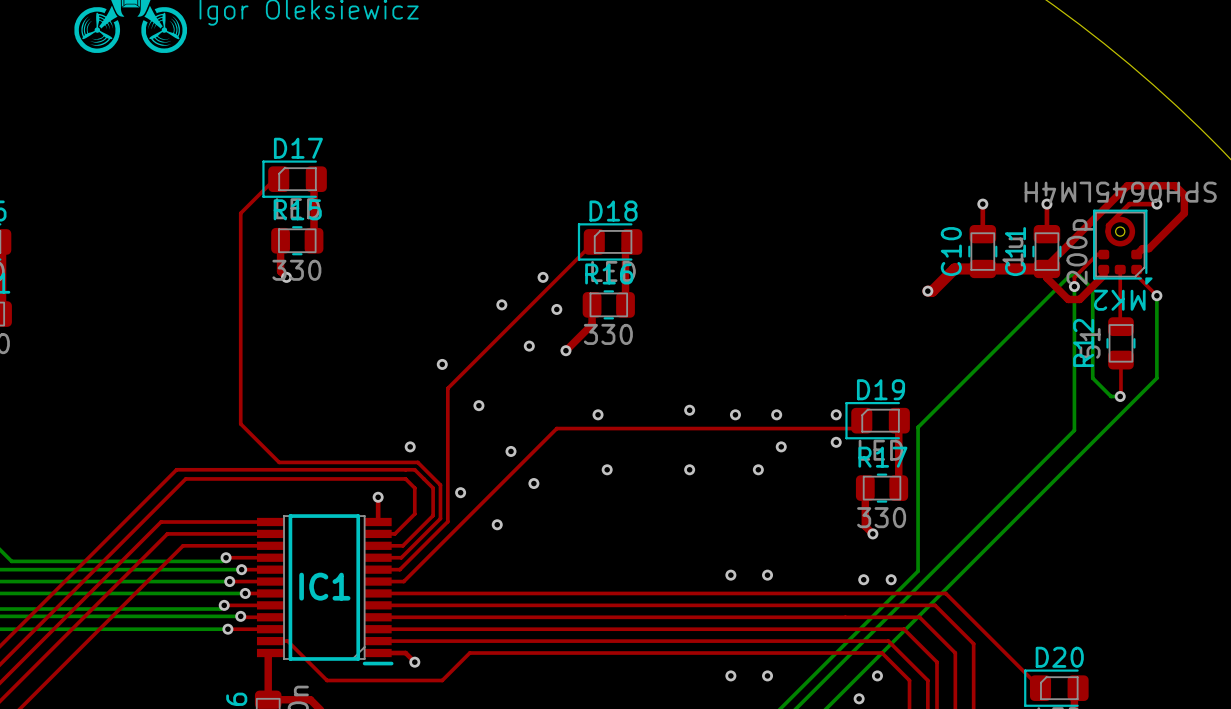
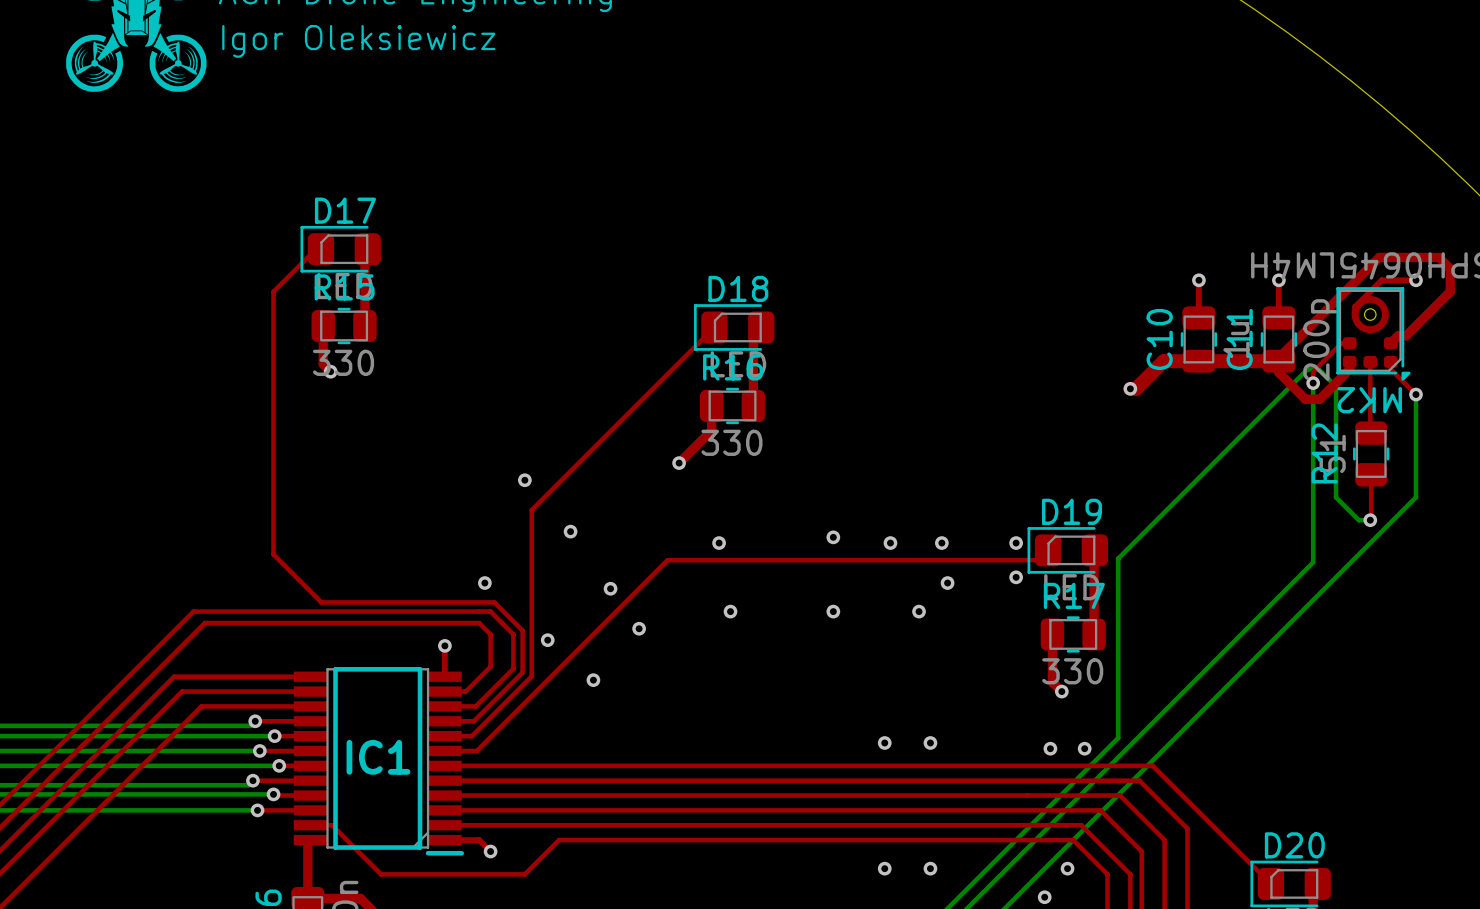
via: (543, 277) -> none
via: (501, 304) -> none
via: (556, 309) -> none
via: (529, 346) -> none

